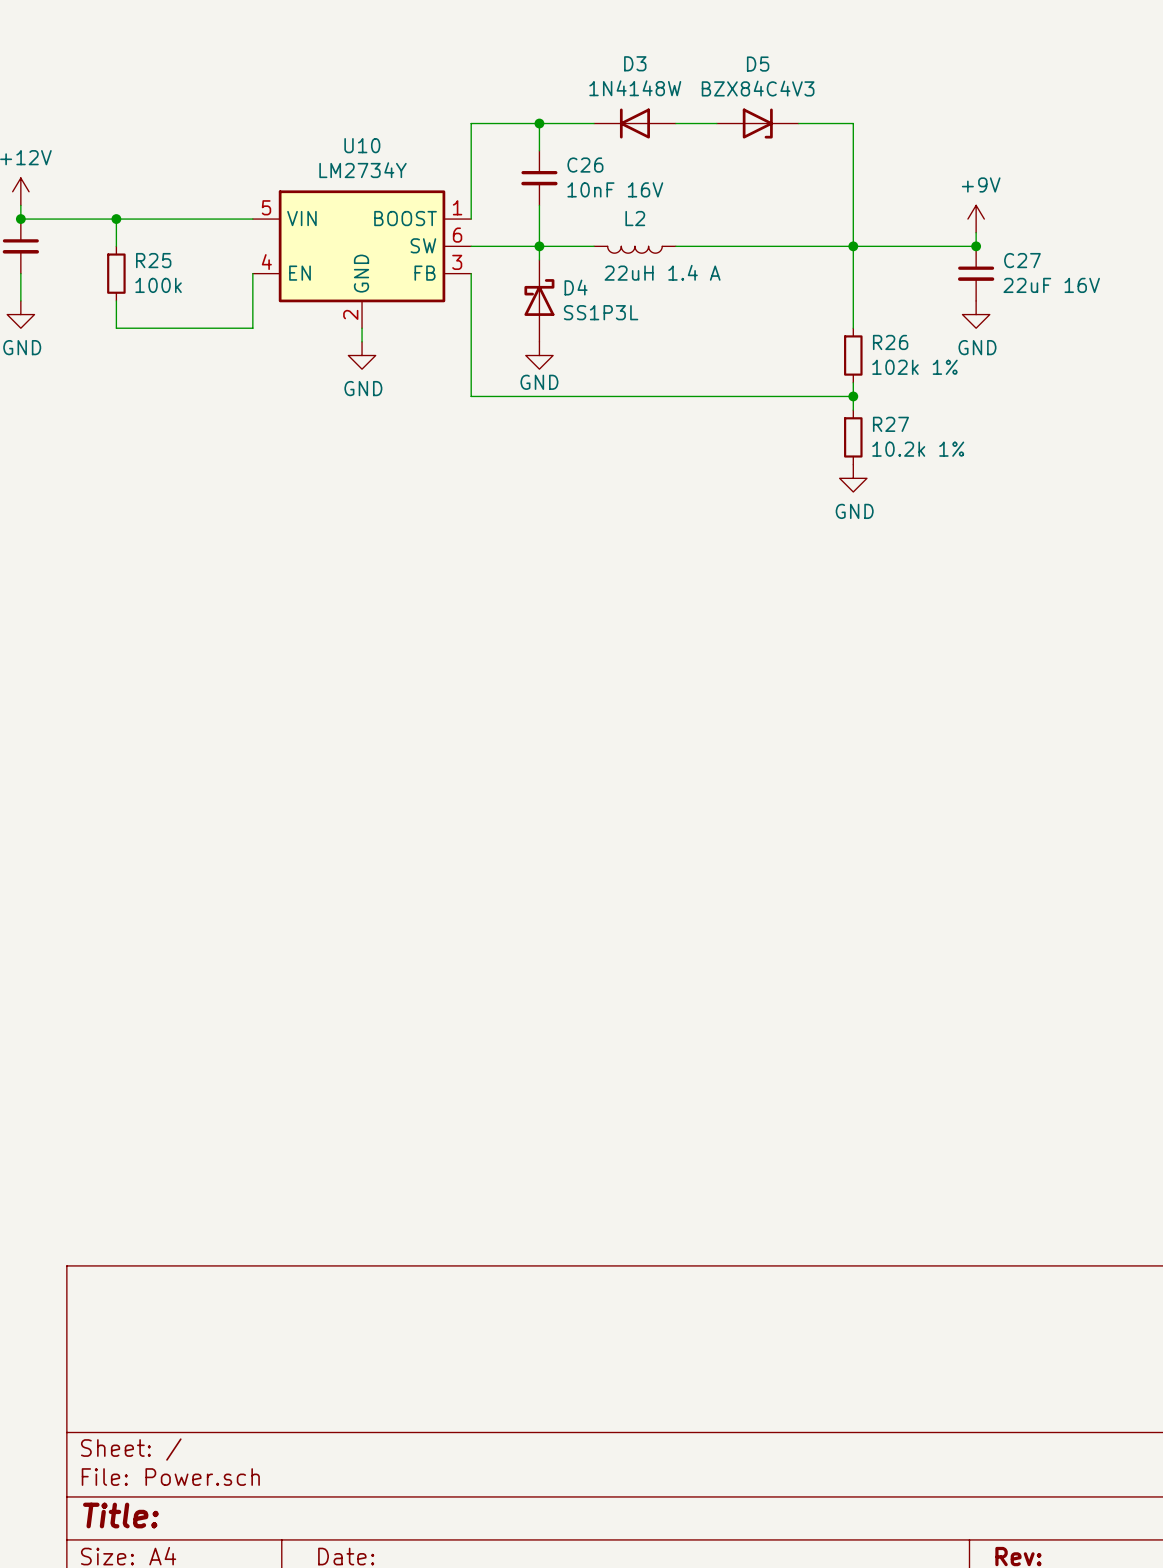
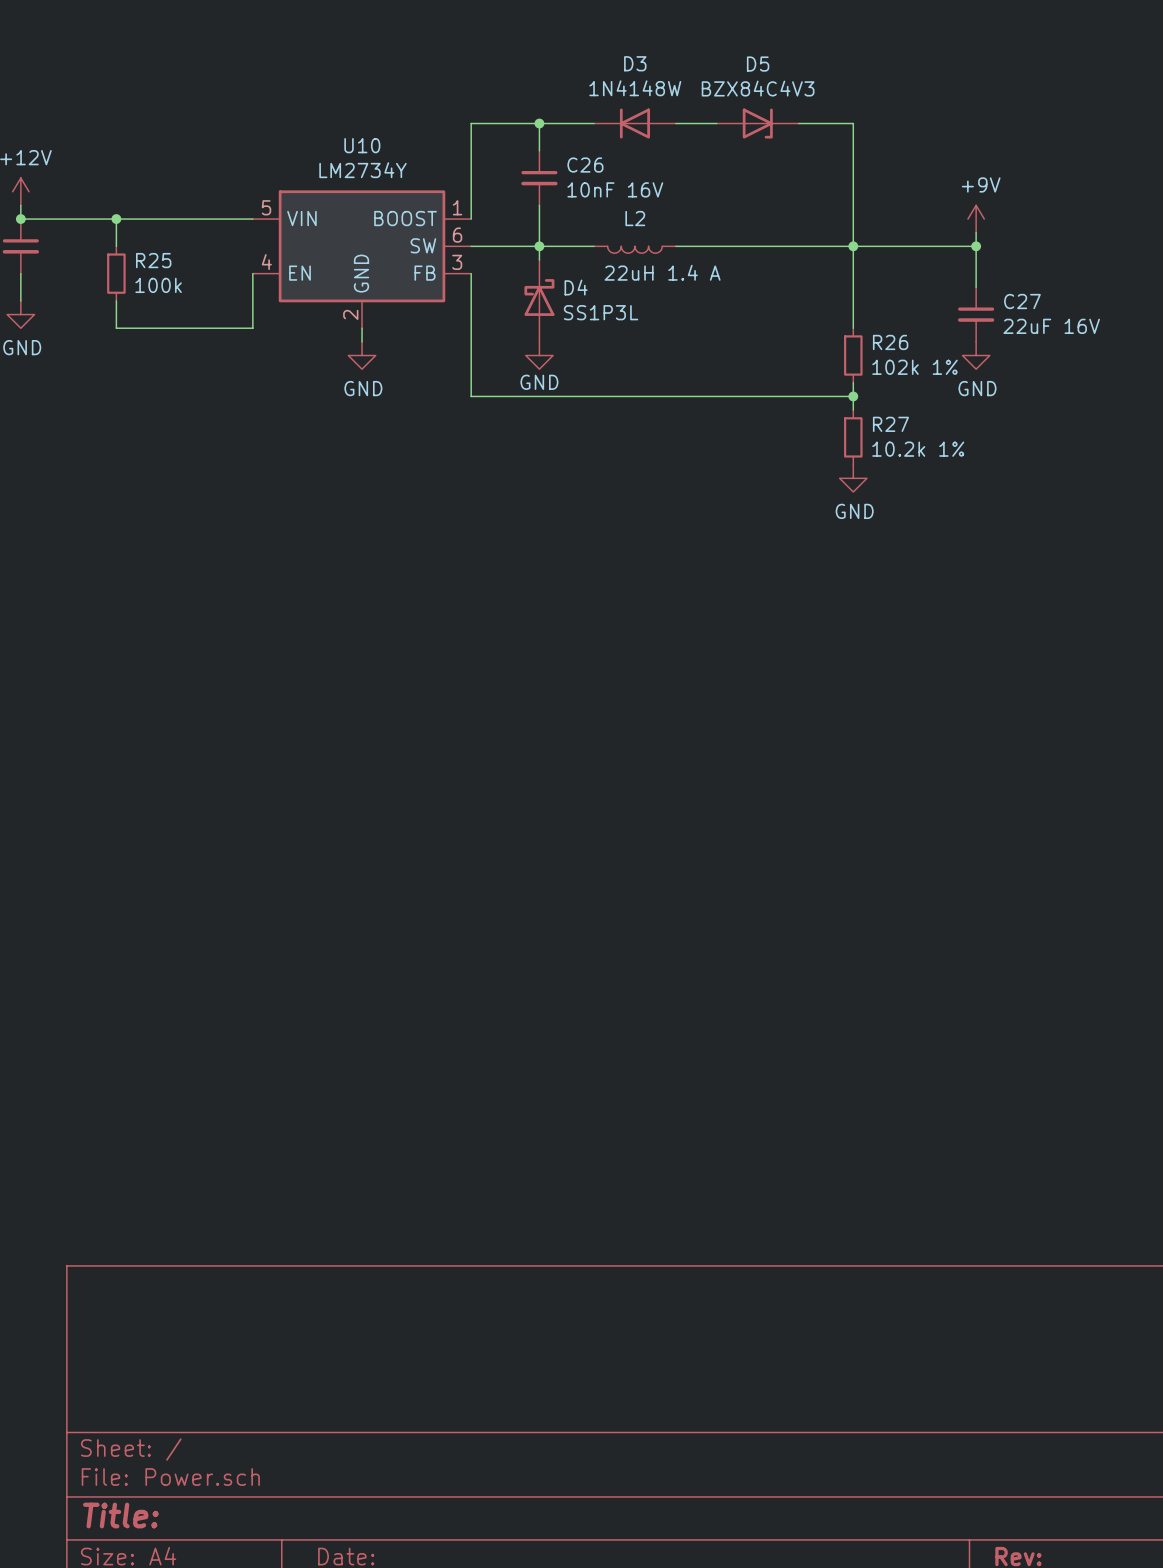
C27 position: (976, 273) -> (976, 314)
power symbol position: GND (976, 314) -> GND (976, 355)

